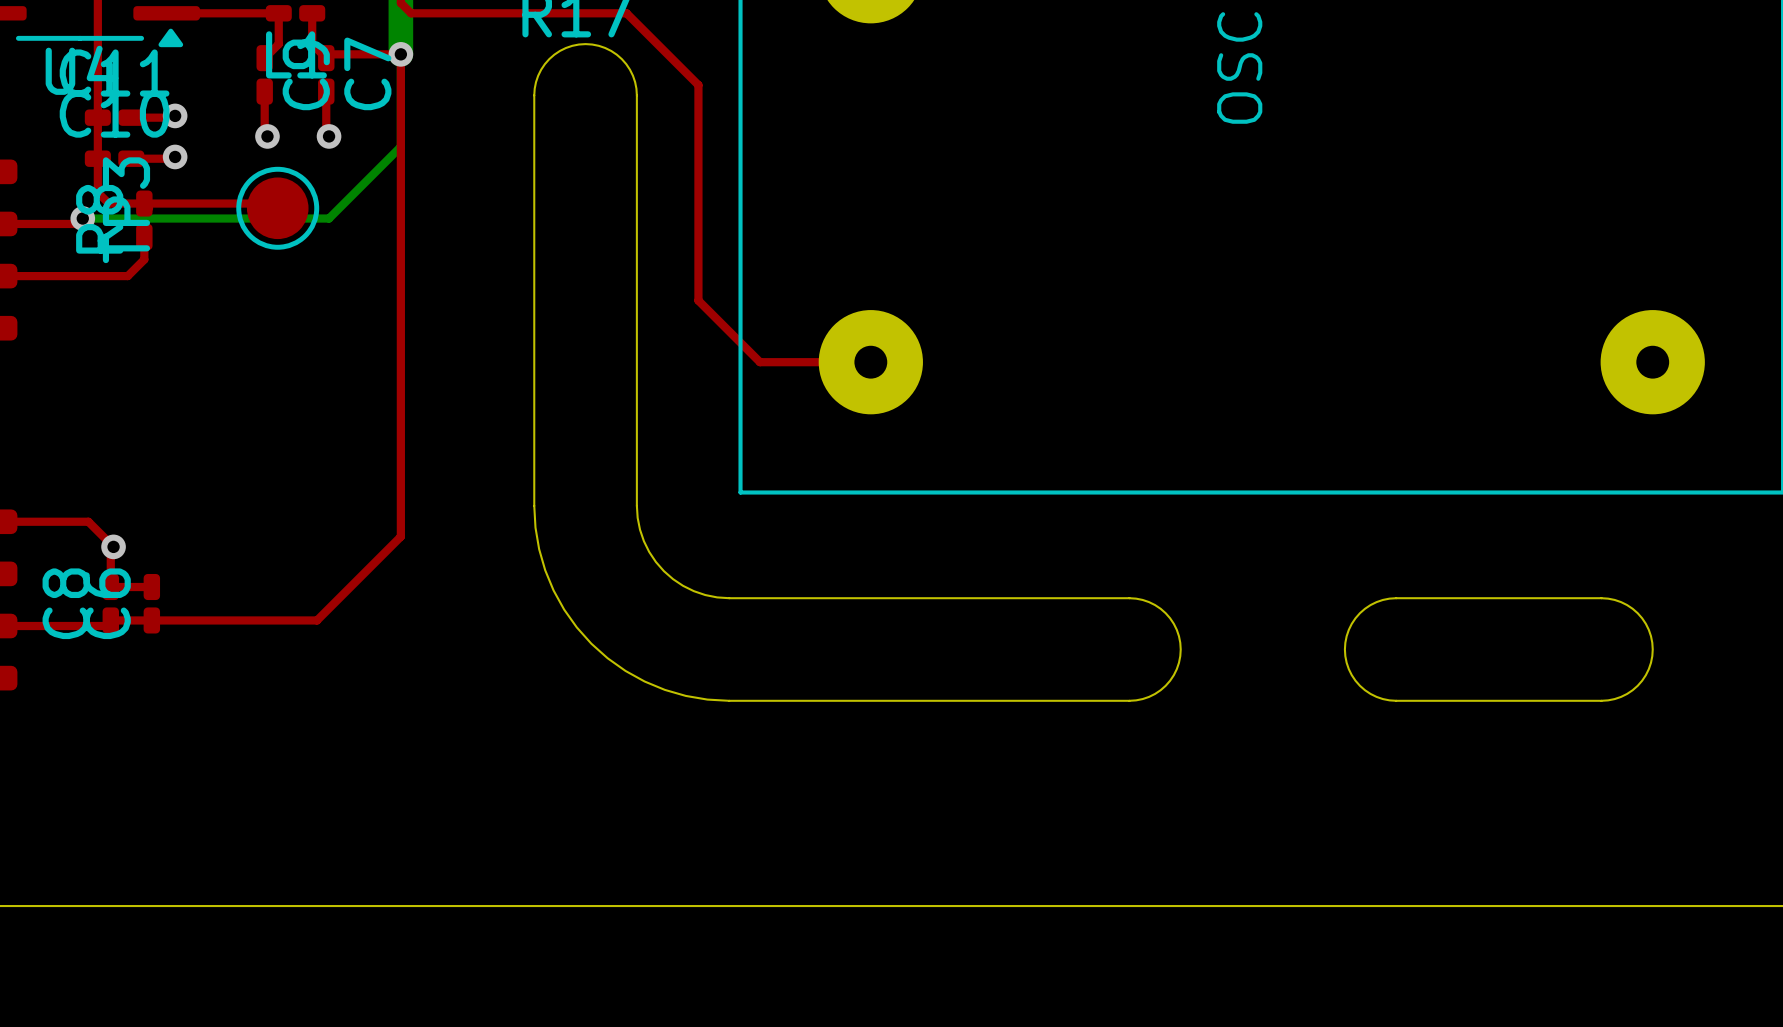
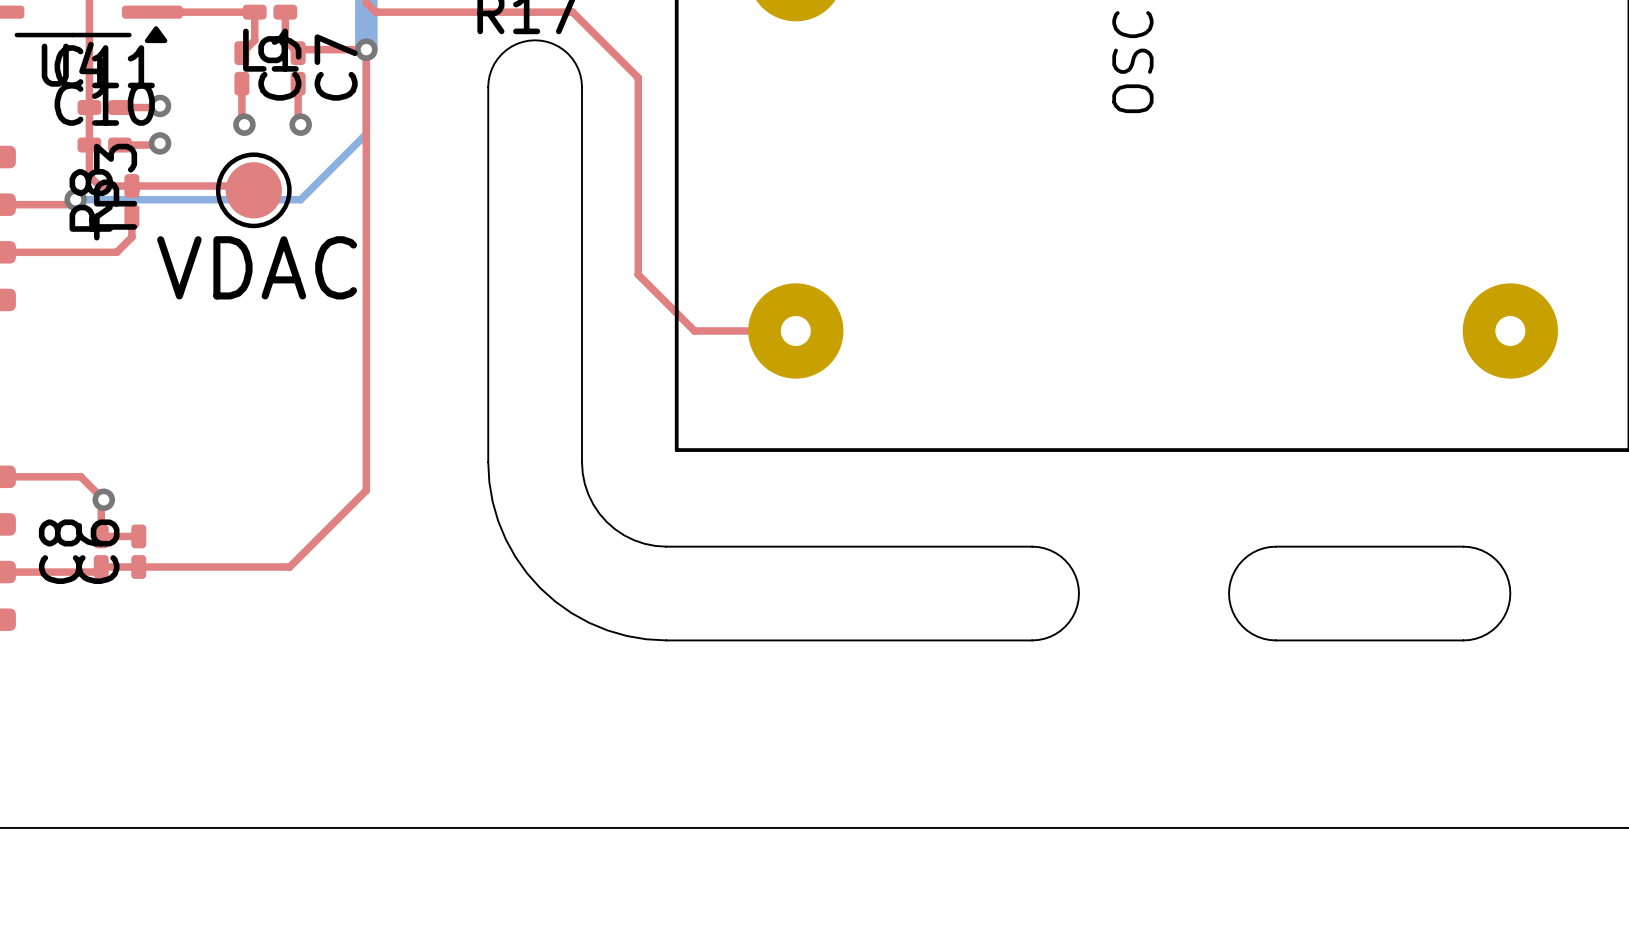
text: none -> VDAC (257, 267)

